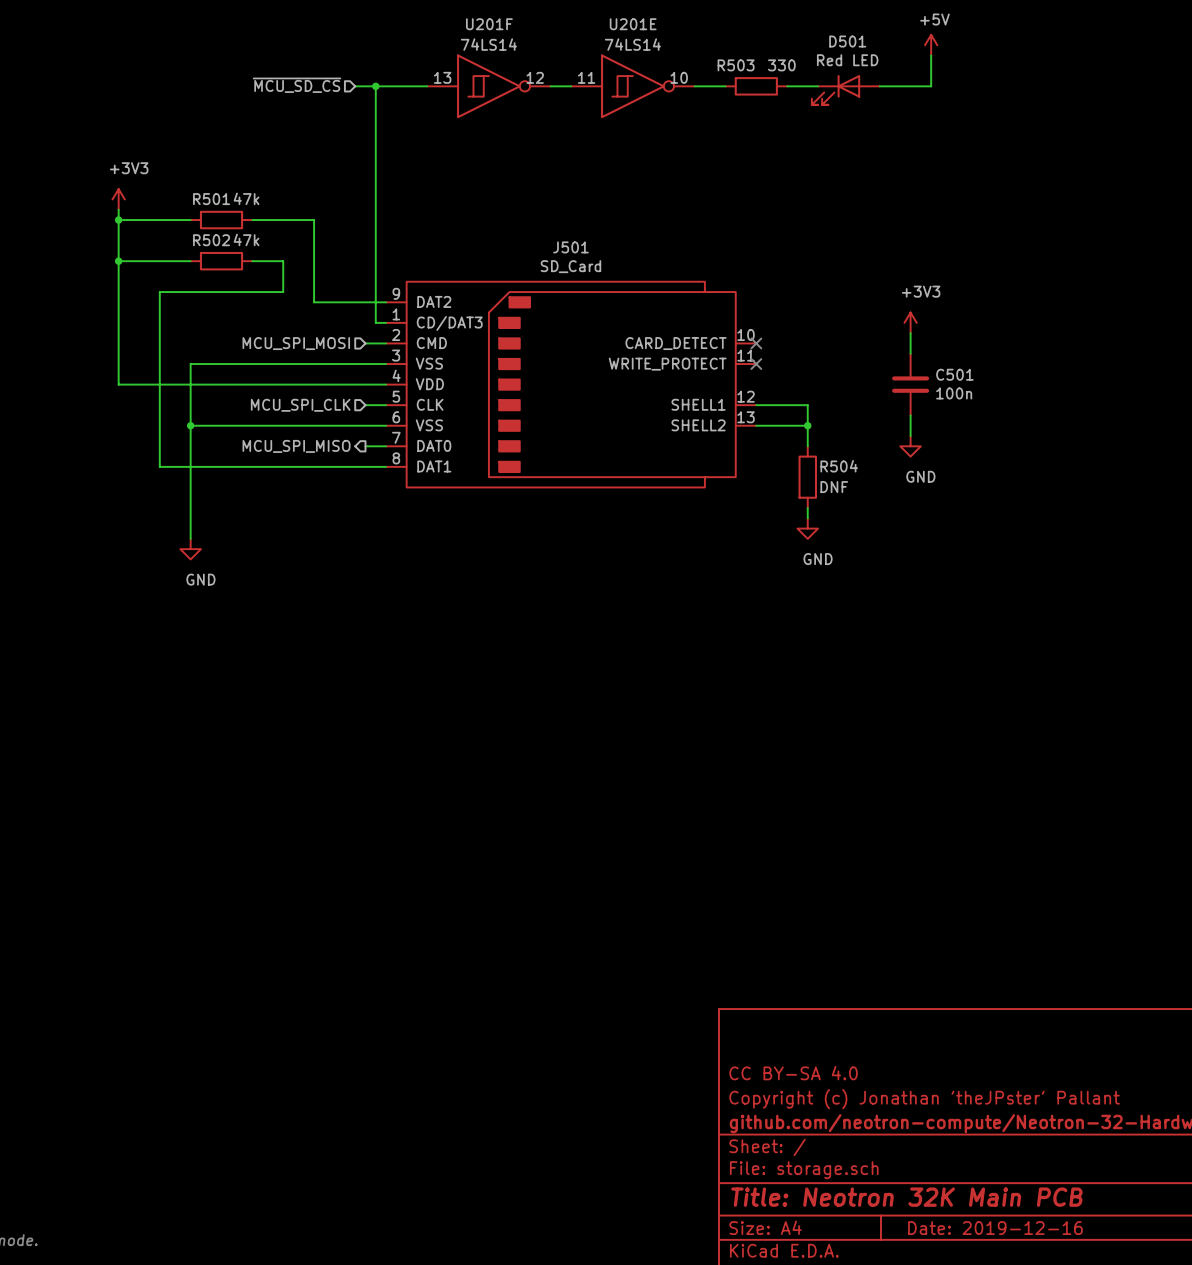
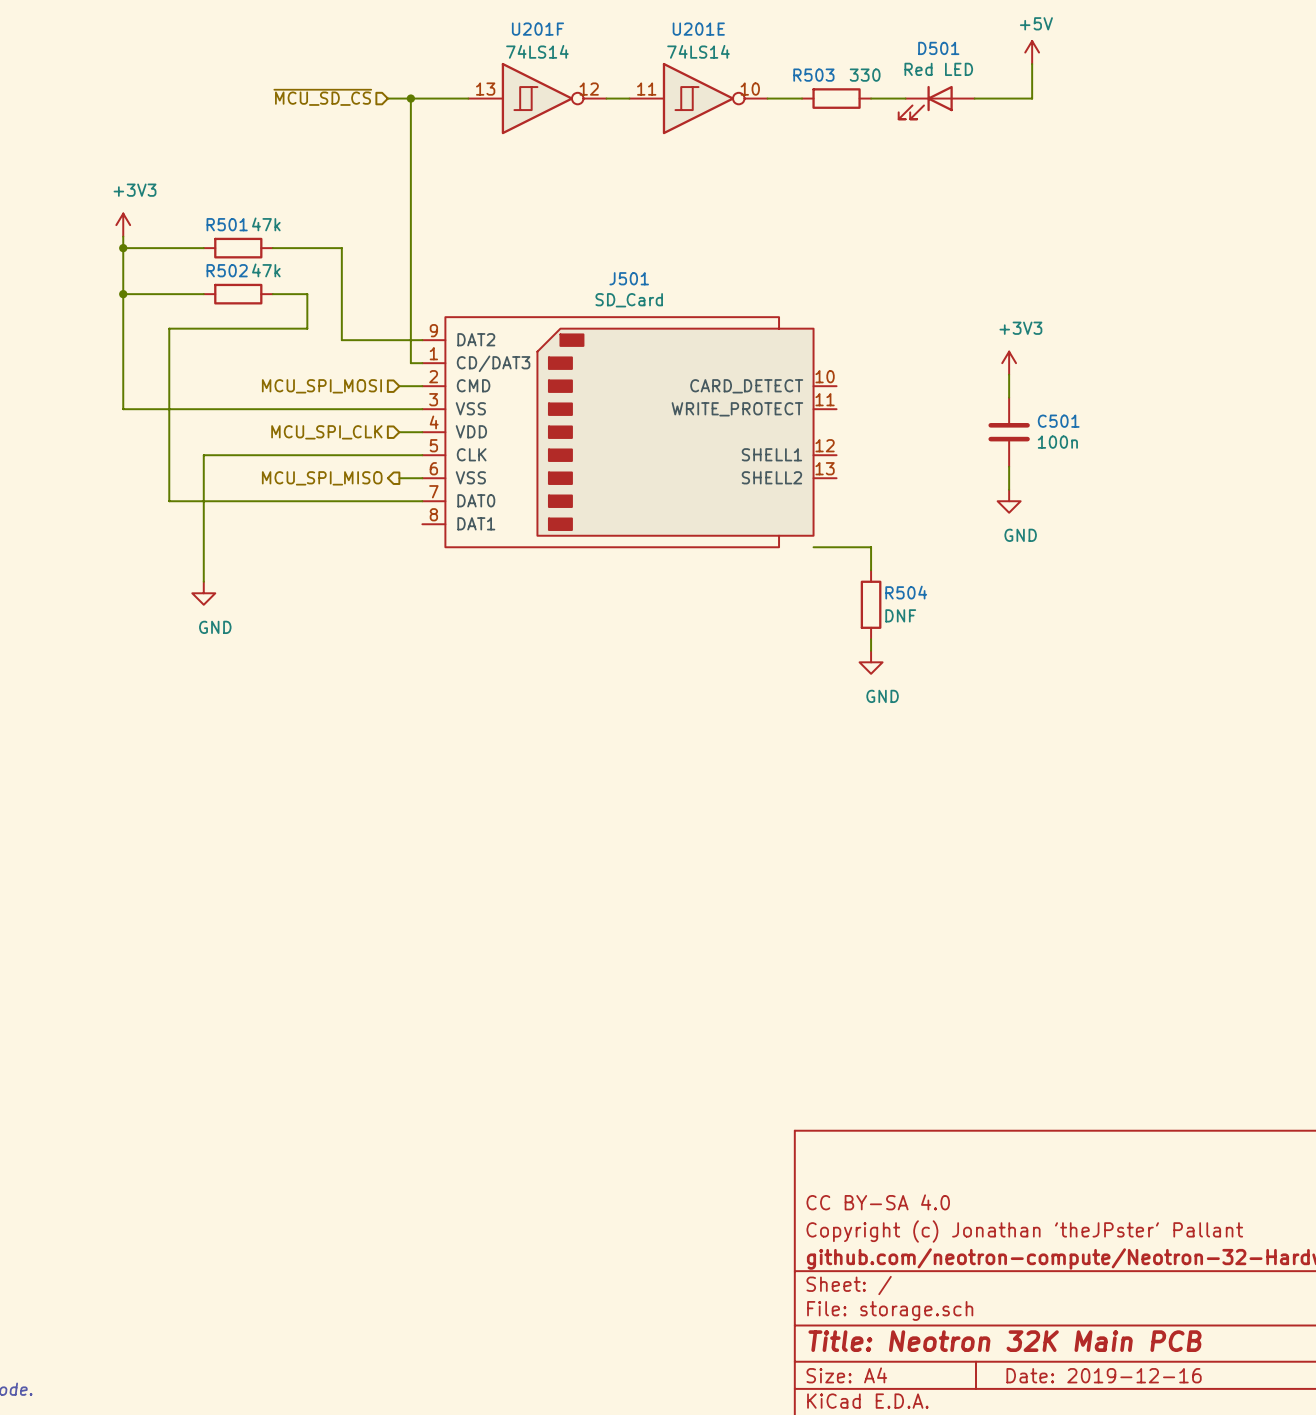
no-connect mark: (756, 343) -> none
wire: (118, 364) (118, 384) (365, 384) -> none
wire: (190, 364) (190, 405) -> (203, 409) (123, 409)
no-connect mark: (756, 364) -> none
hierarchical label position: MCU_SPI_CLK (300, 405) -> MCU_SPI_CLK (326, 432)
wire: (756, 405) (807, 405) (807, 446) -> none
wire: (190, 425) (365, 425) -> (203, 455) (399, 455)
junction: (190, 425) -> none
wire: (756, 425) (807, 425) -> none
junction: (807, 425) -> none
wire: (159, 446) (159, 466) (386, 466) -> (169, 501) (399, 501)
hierarchical label position: MCU_SPI_MISO (296, 446) -> MCU_SPI_MISO (322, 478)
R504 position: (807, 477) -> (871, 604)
wire: none -> (813, 547) (871, 547) (871, 570)
wire: (807, 508) (807, 518) -> (871, 639) (871, 650)
power symbol position: GND (807, 528) -> GND (871, 662)
power symbol position: GND (190, 549) -> GND (203, 593)

